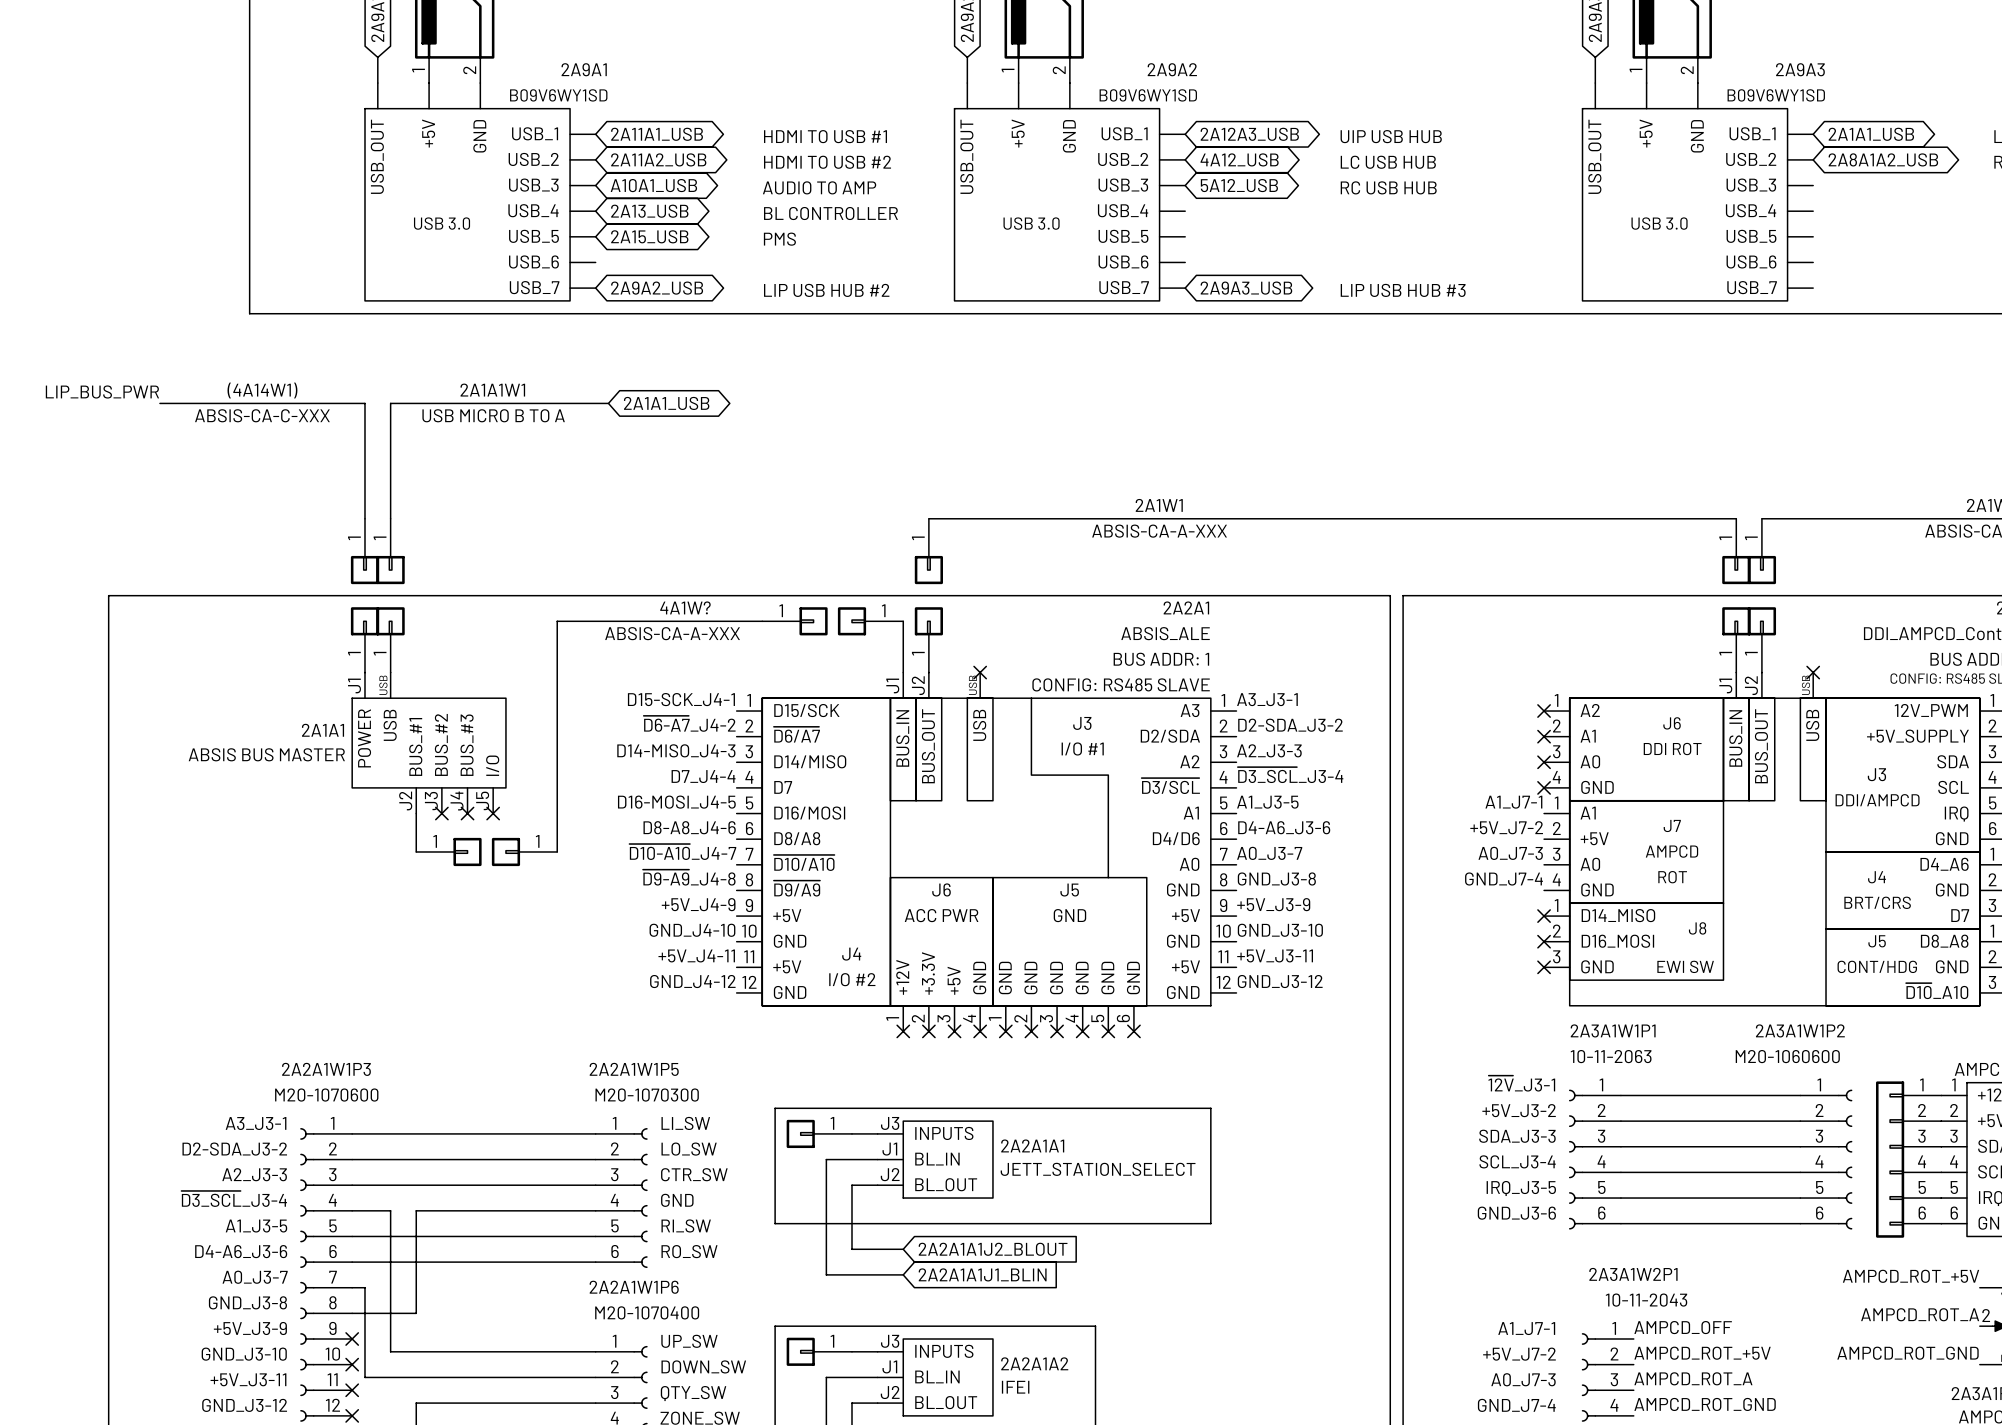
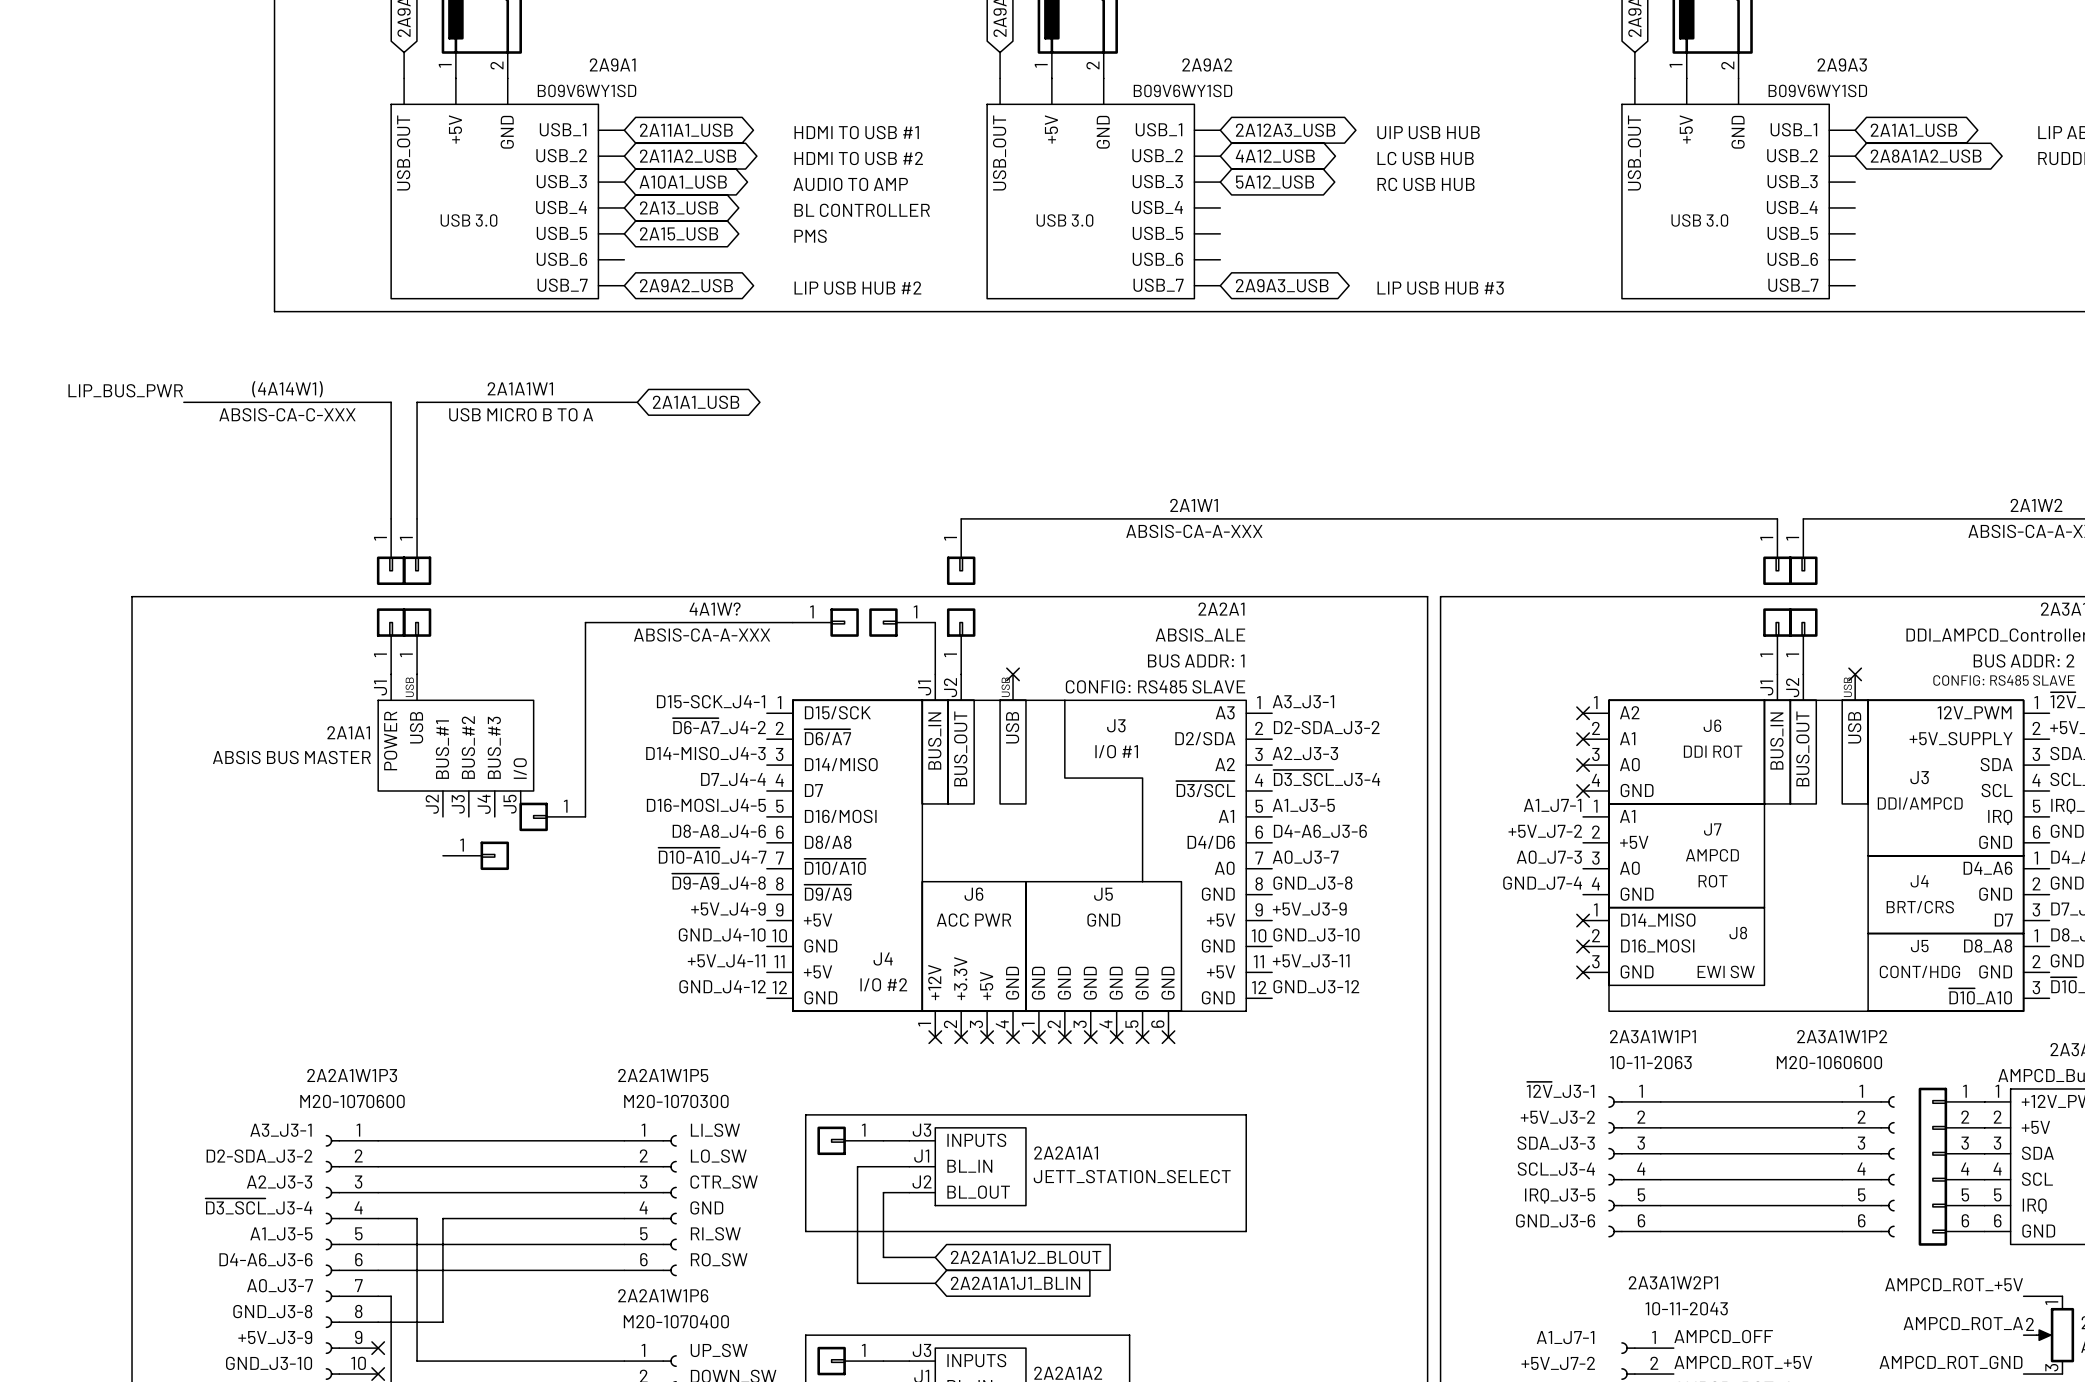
wire: (416, 813) (416, 851) -> none
no-connect mark: (441, 813) -> none
no-connect mark: (467, 813) -> none
no-connect mark: (493, 813) -> none
wire: (557, 813) (557, 851) -> none
4A1W? position: (524, 851) -> (552, 816)

